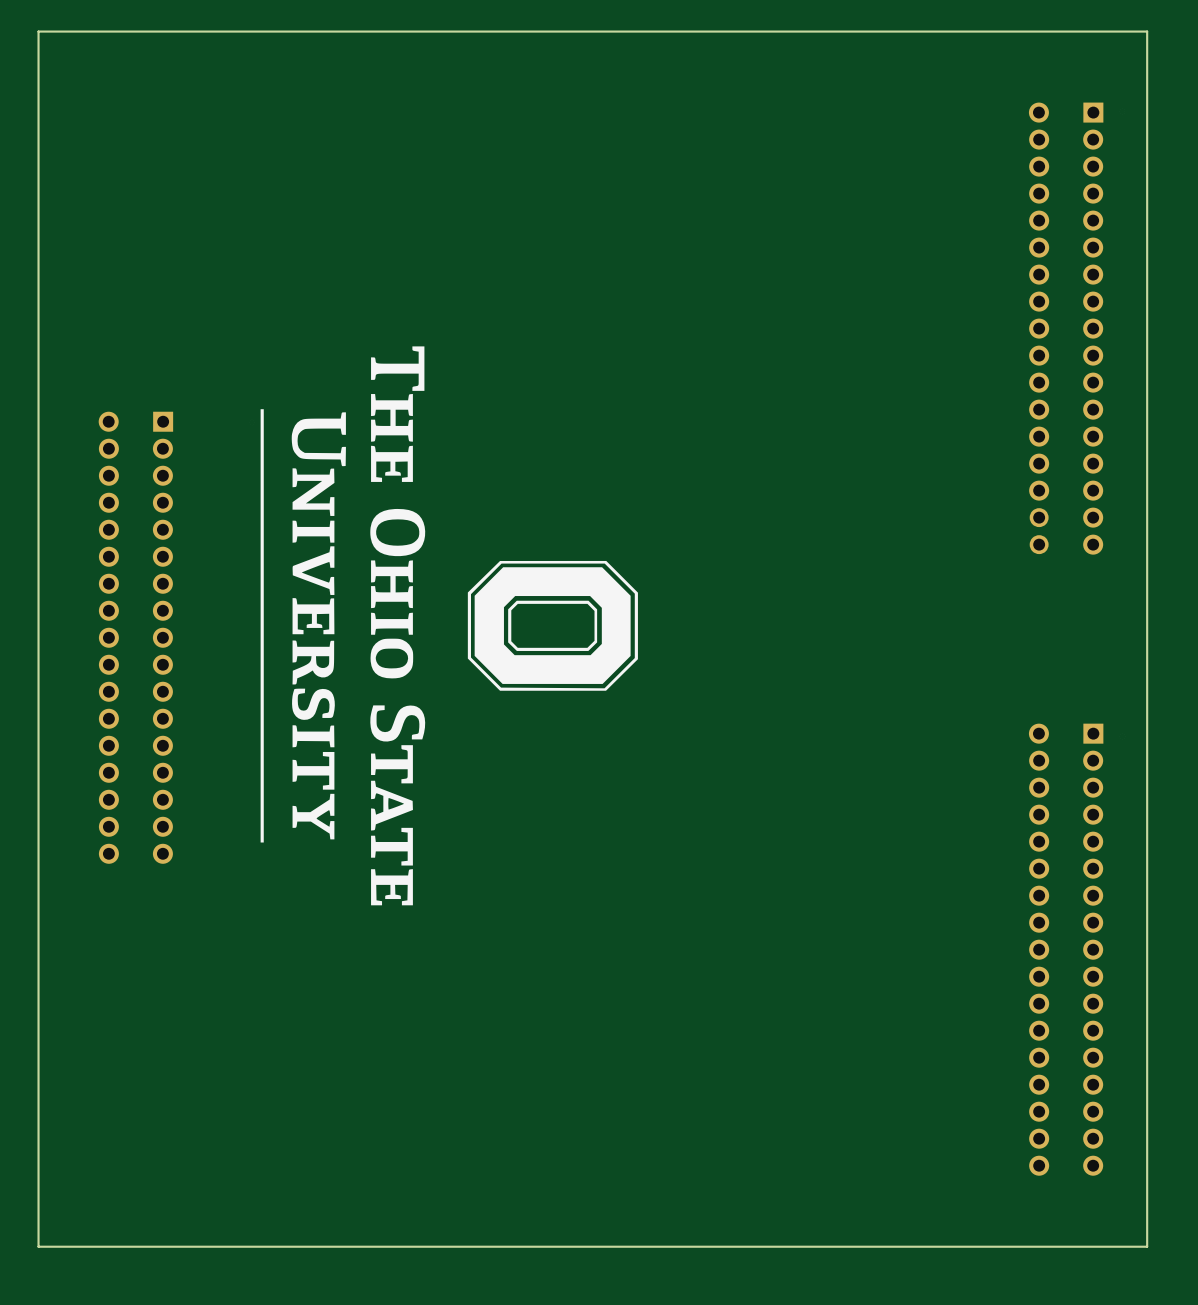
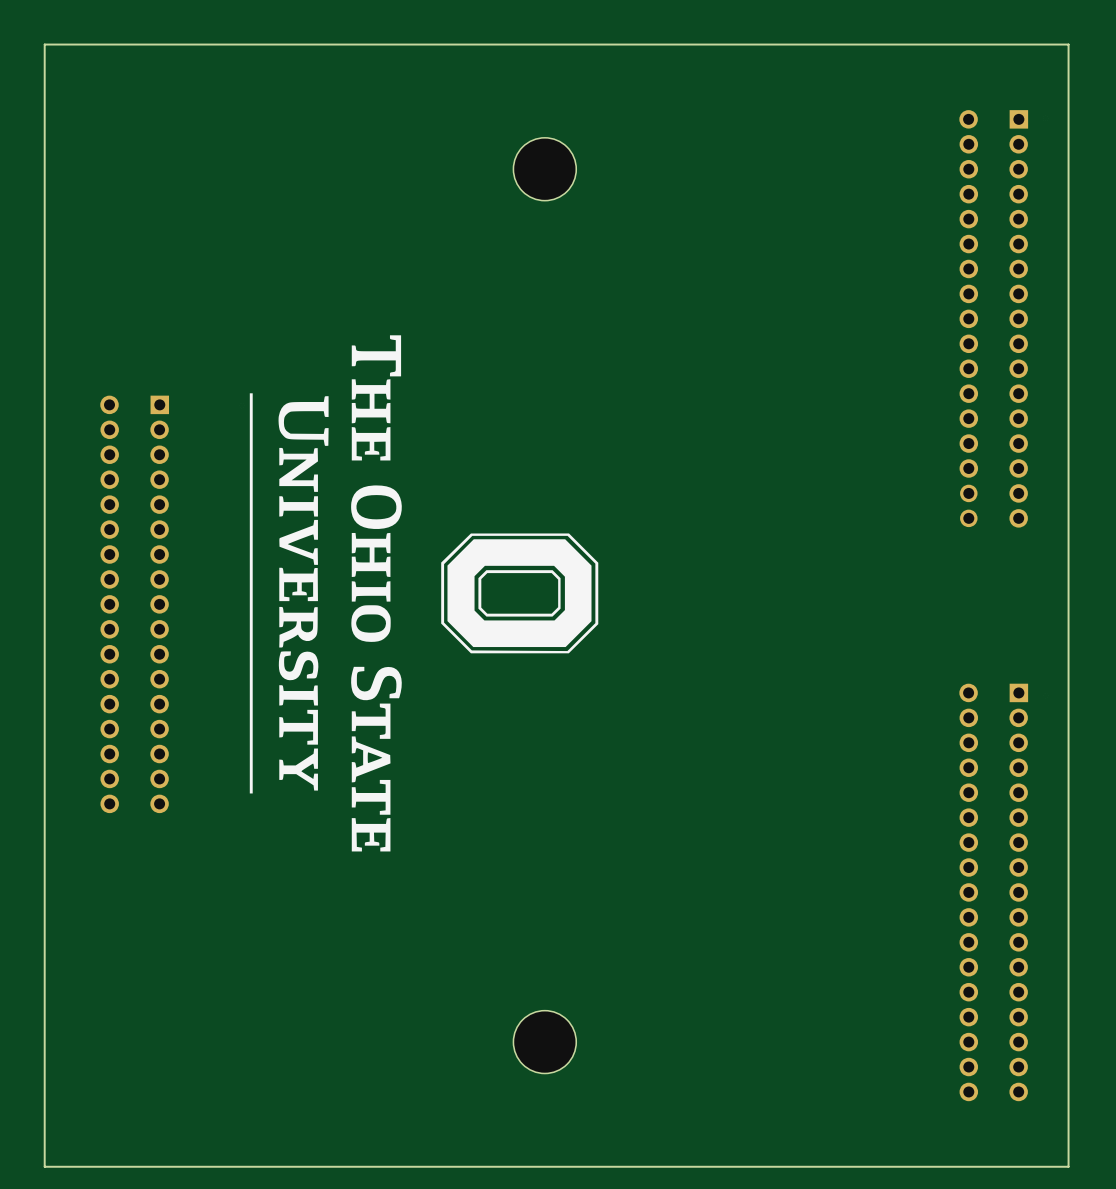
part: none -> (544, 169)
part: none -> (544, 1042)

